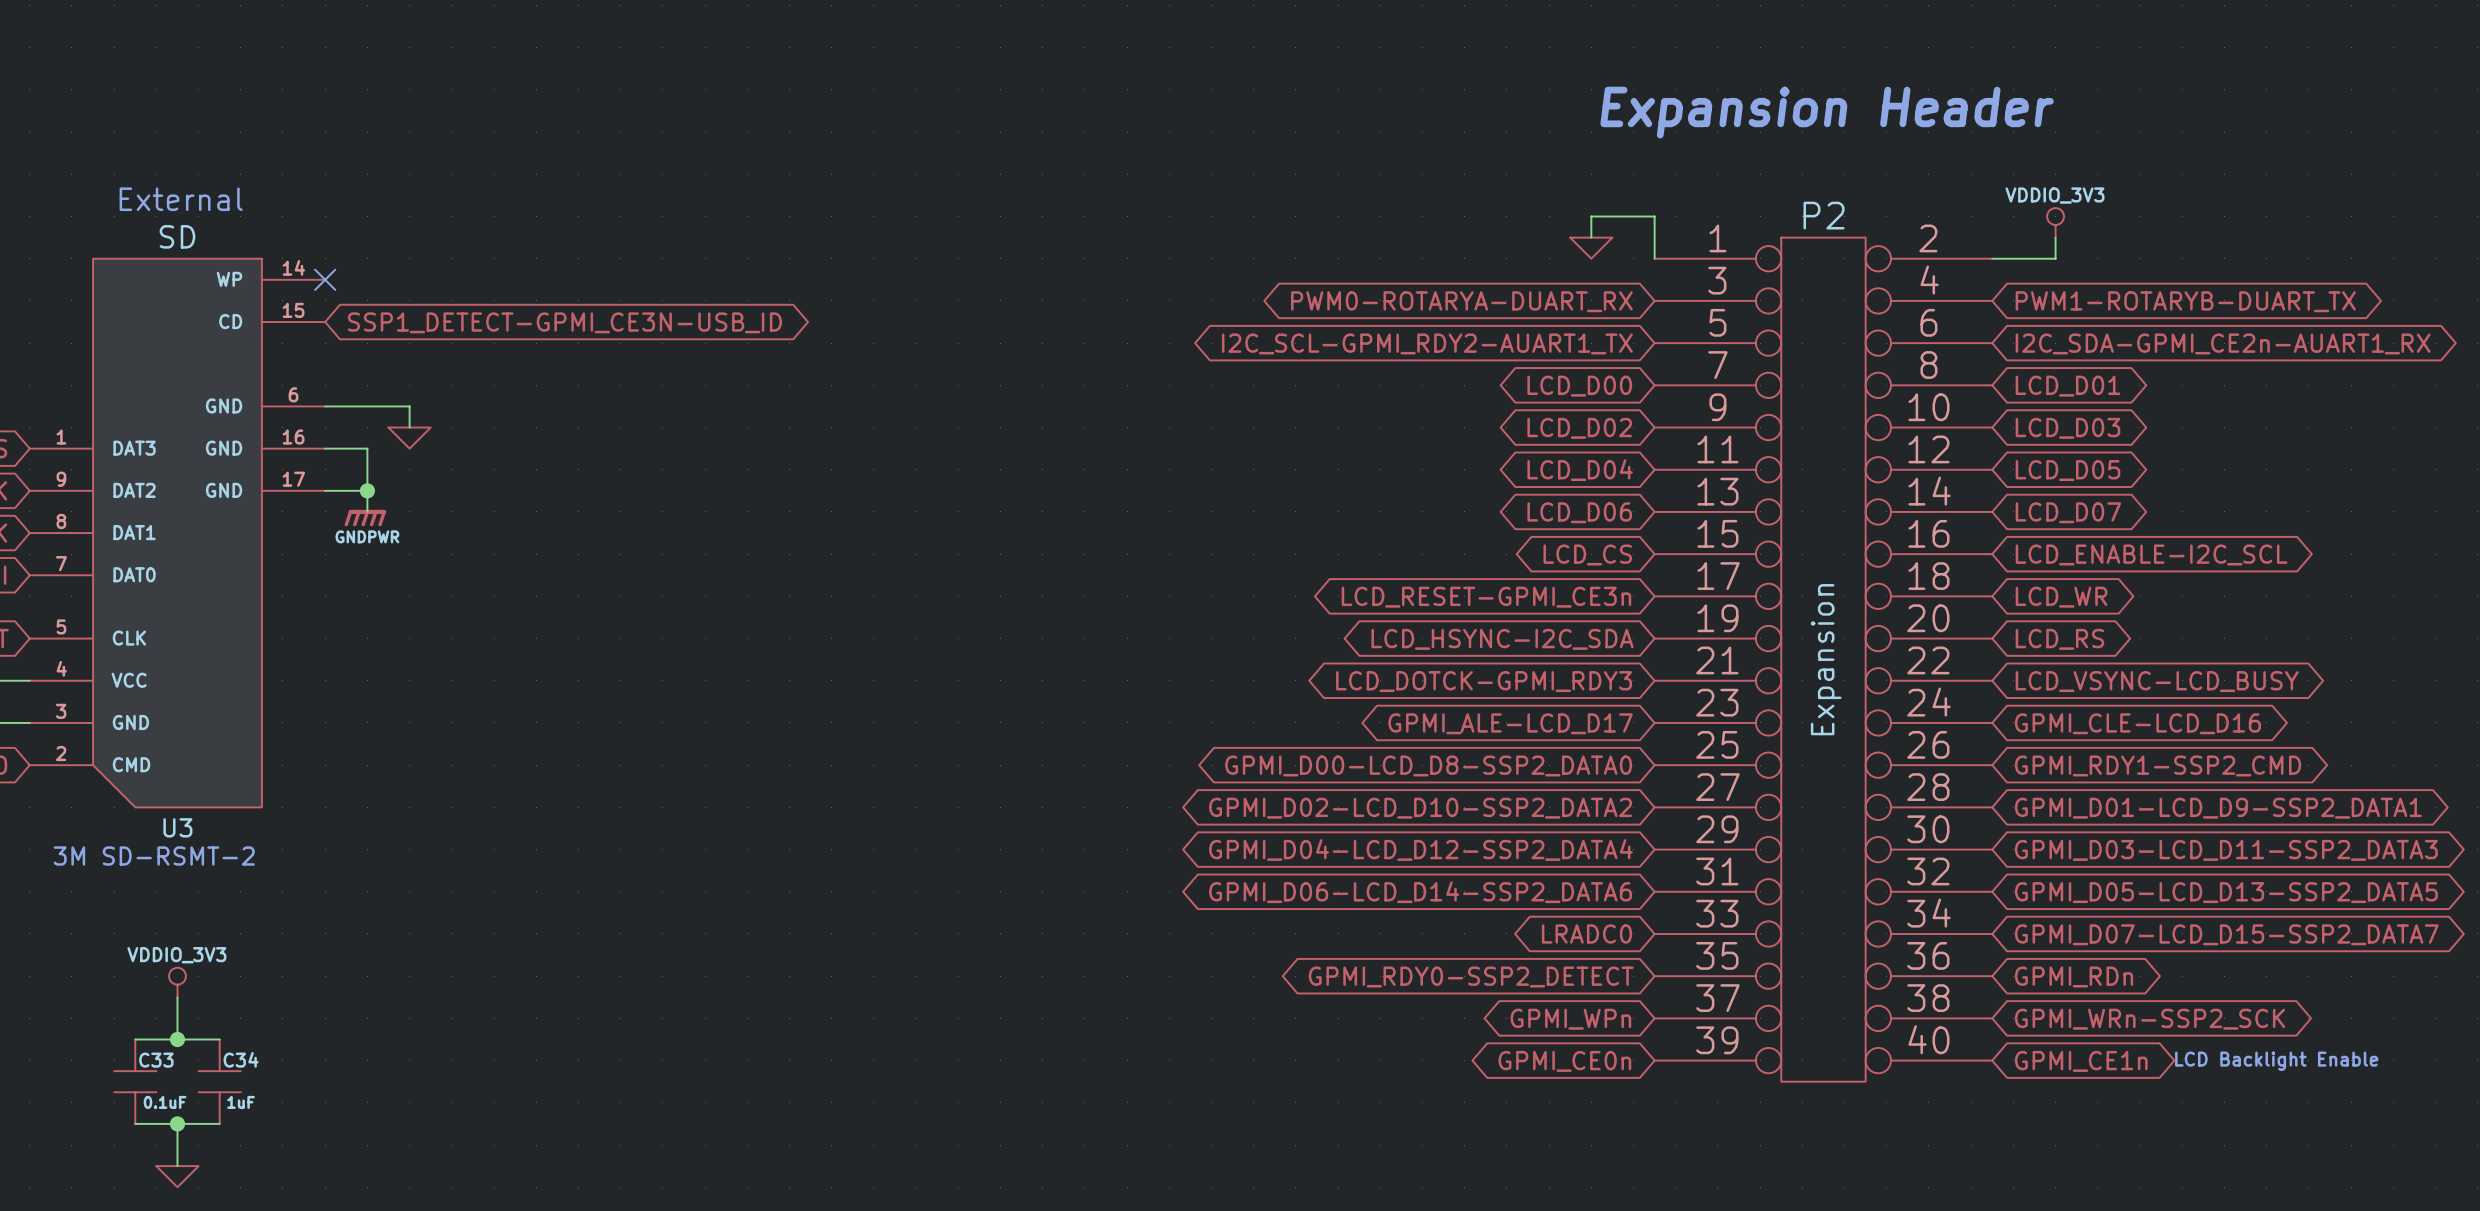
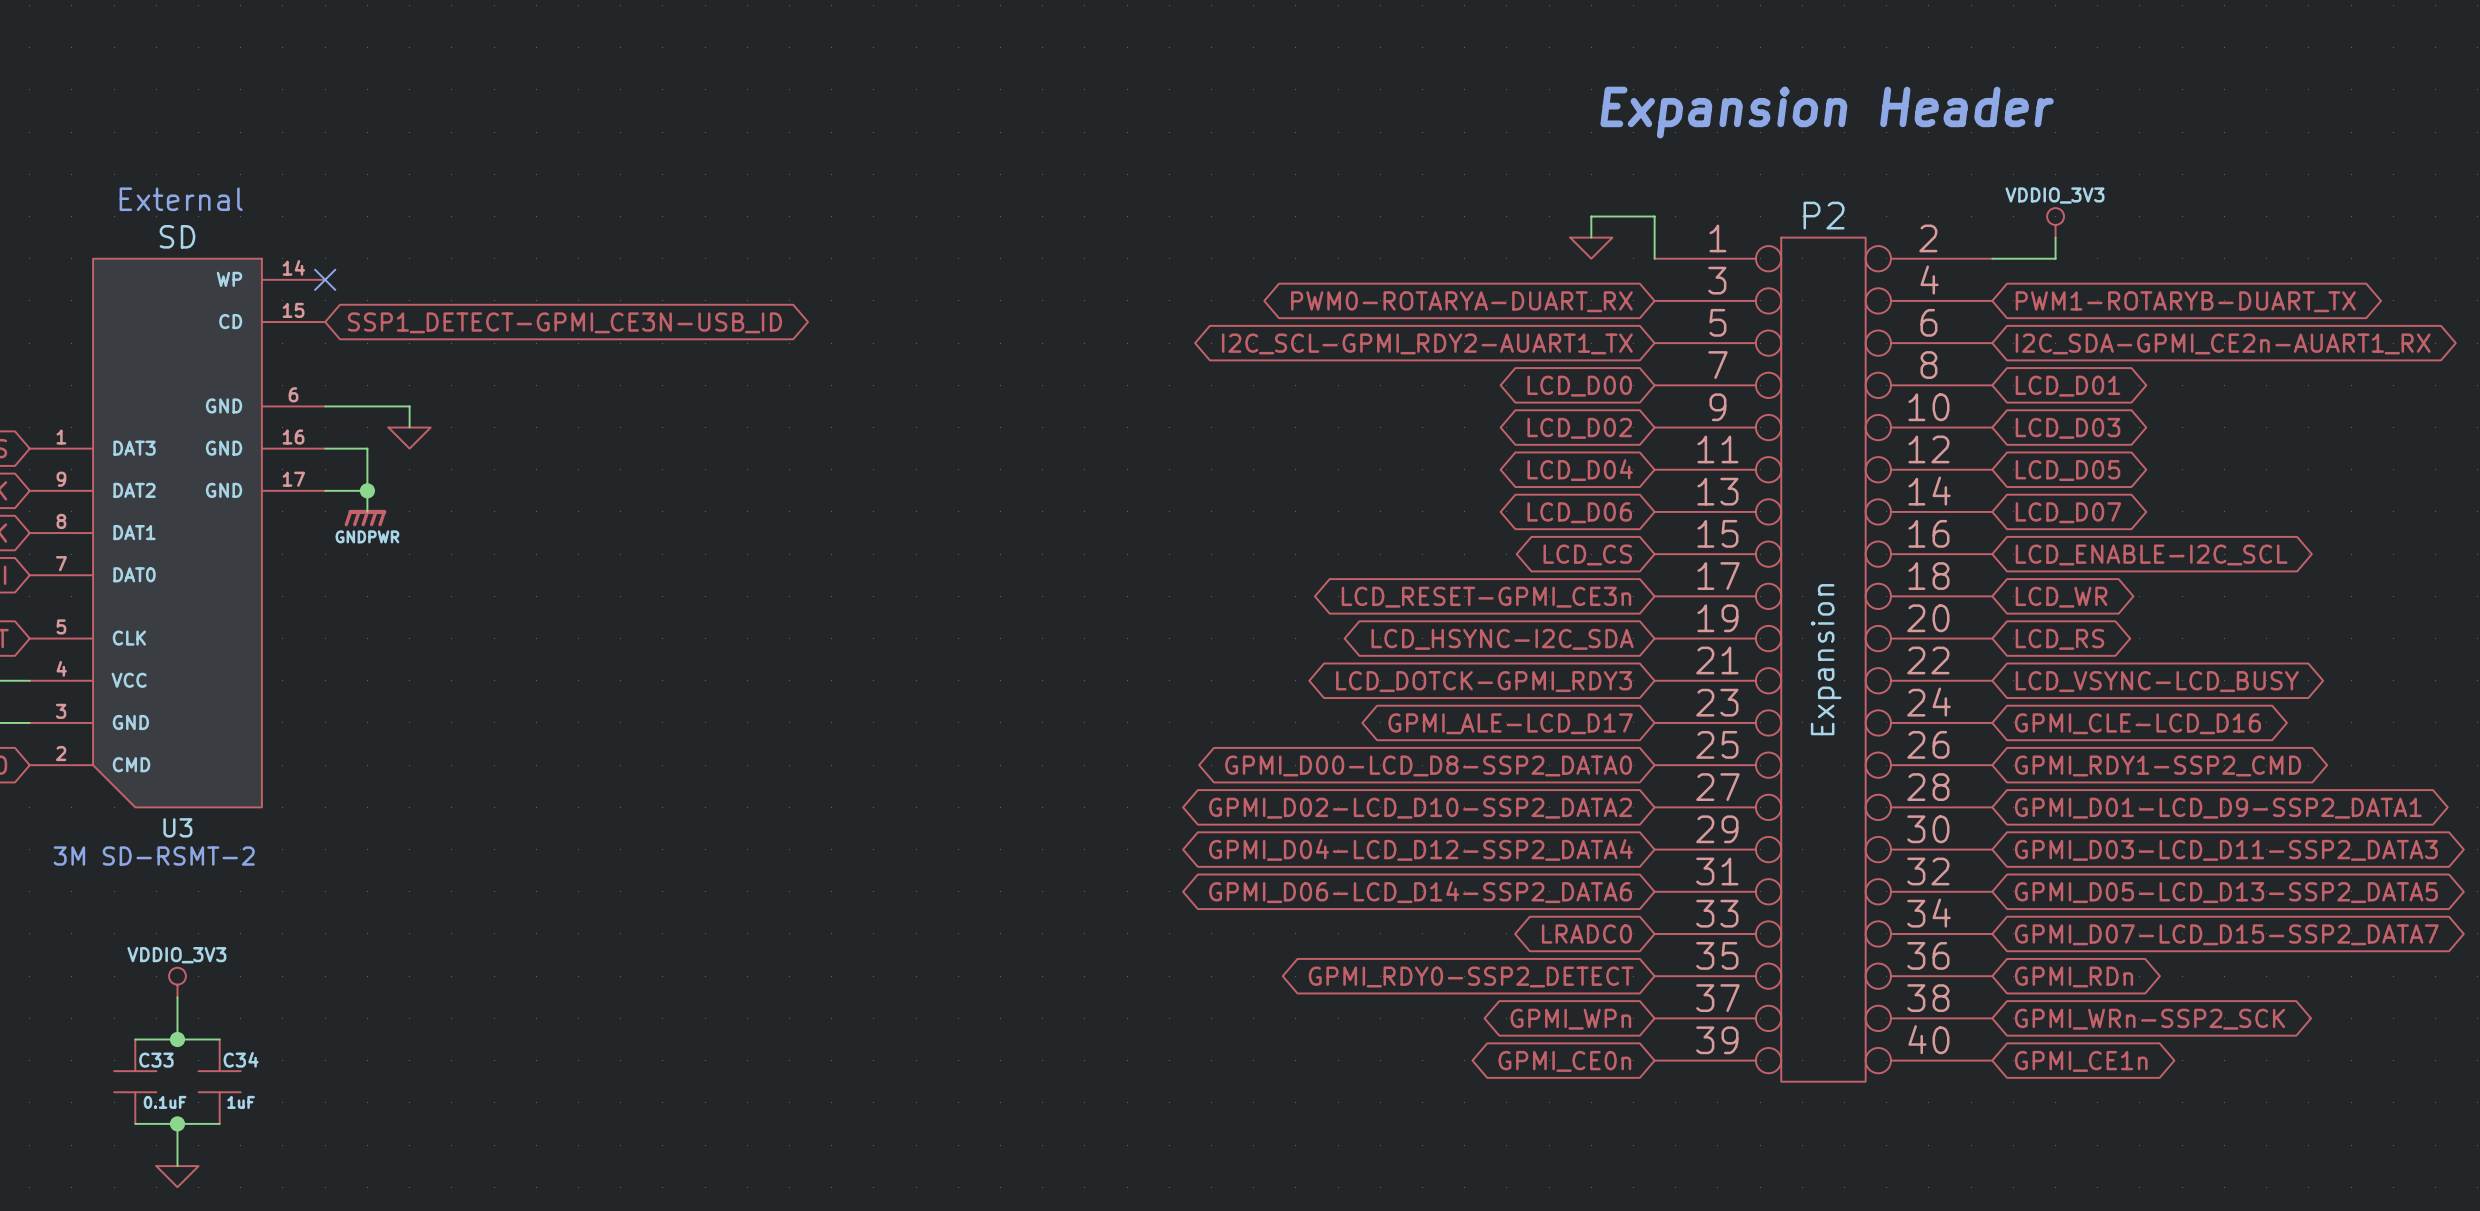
text: LCD Backlight Enable (2276, 1061) -> none

